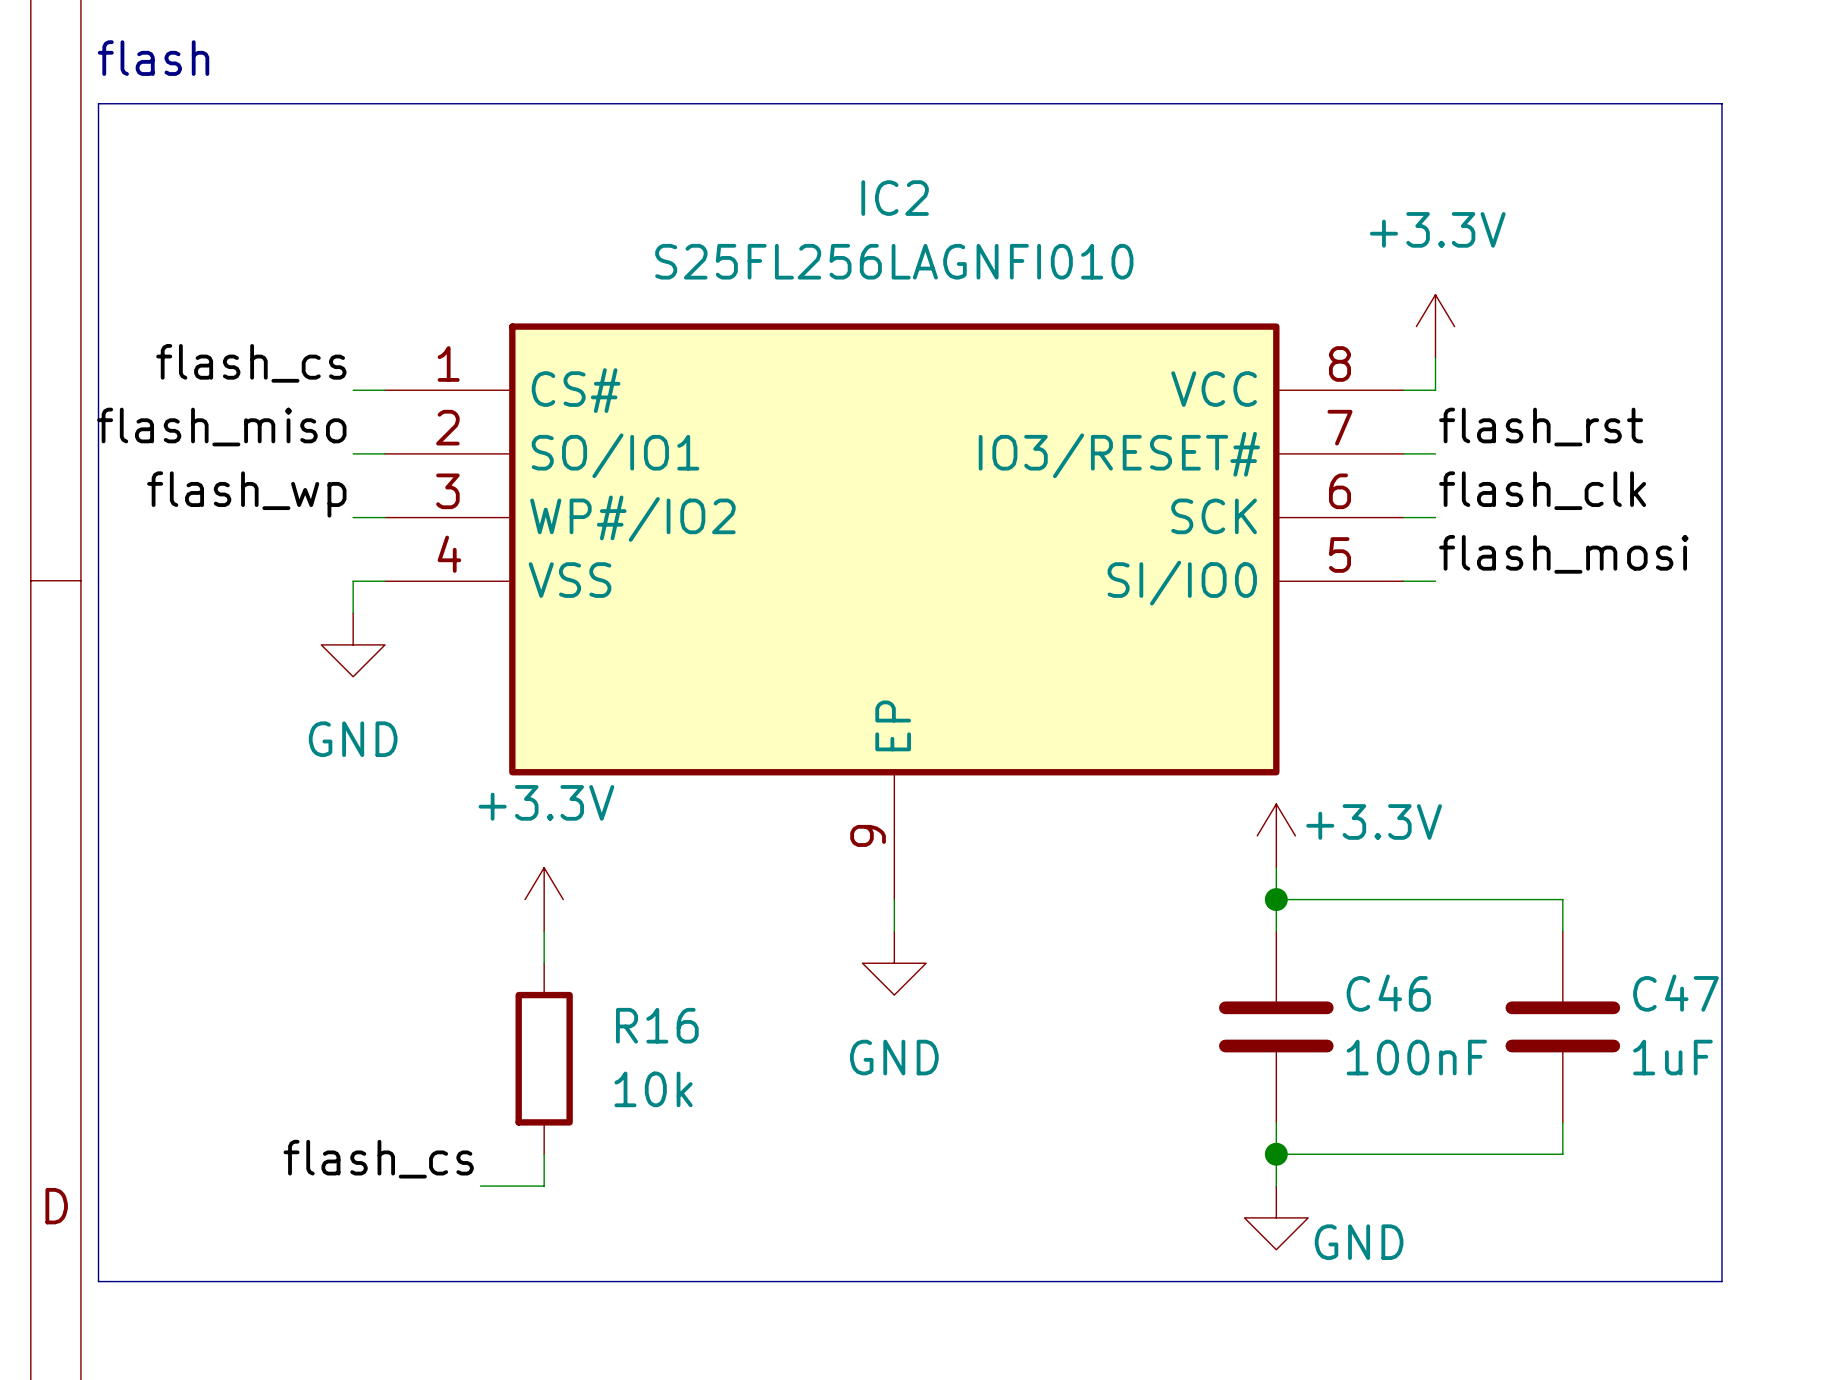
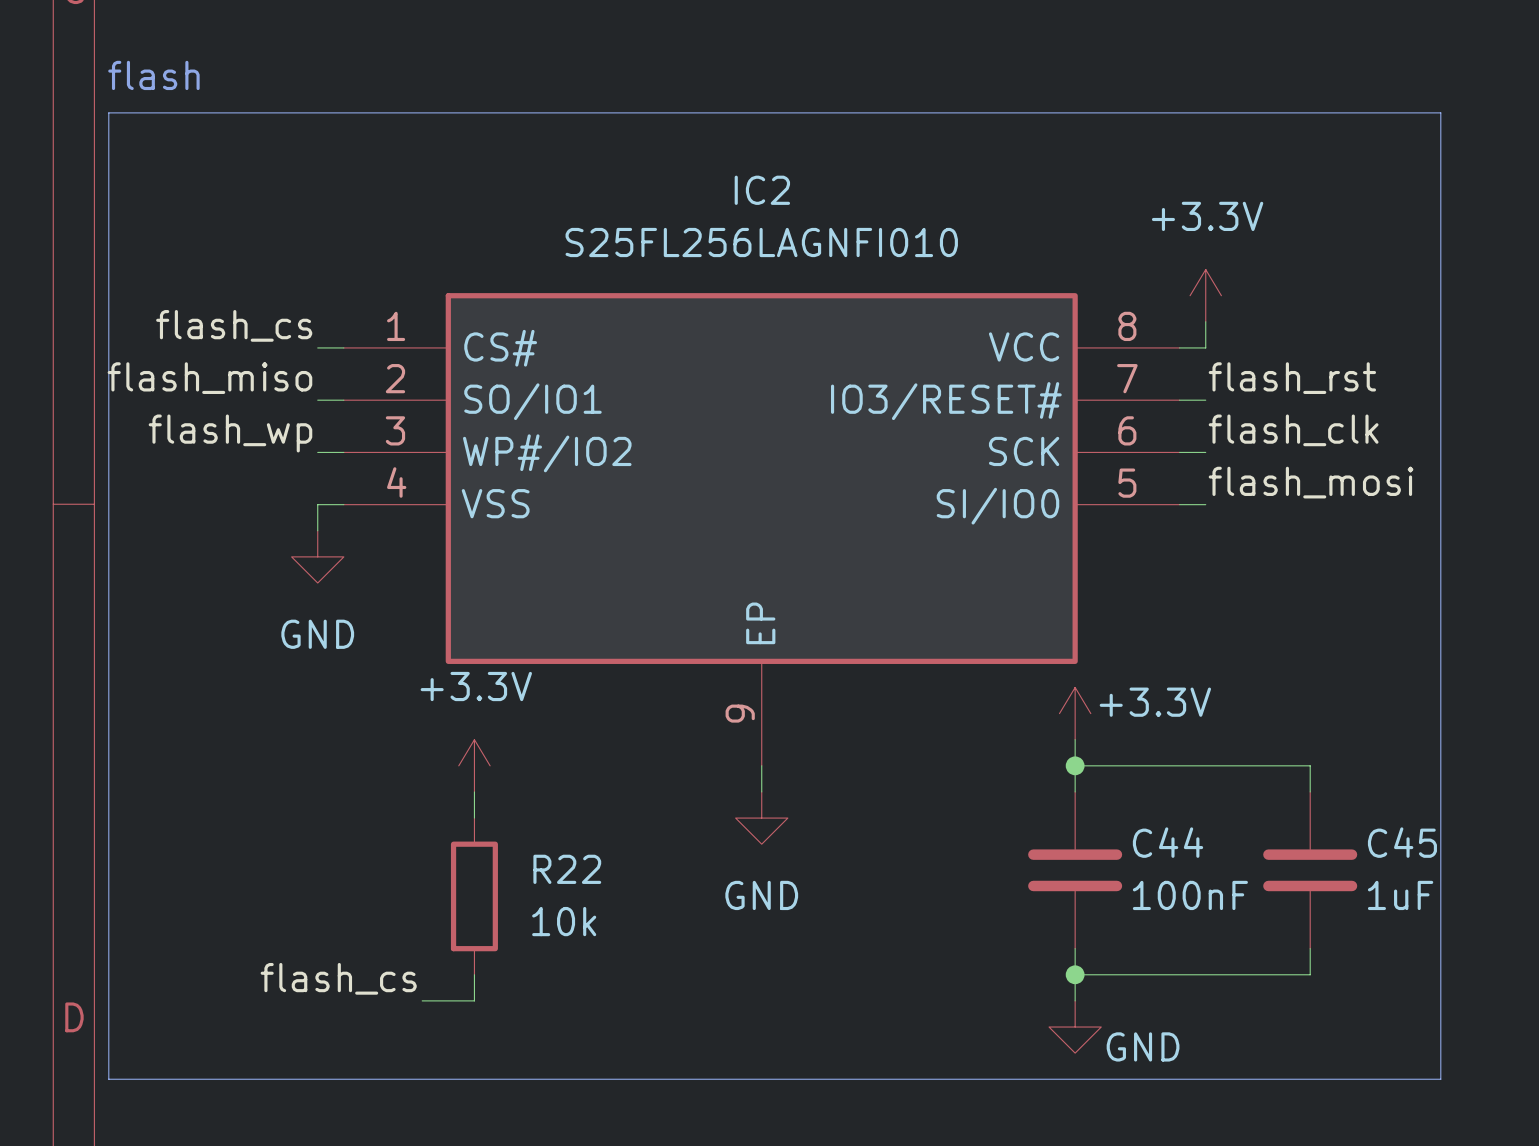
C46 name: C46 (1388, 993) -> C44 (1168, 842)
C47 name: C47 (1675, 993) -> C45 (1402, 842)
R16 name: R16 (657, 1025) -> R22 (567, 869)

